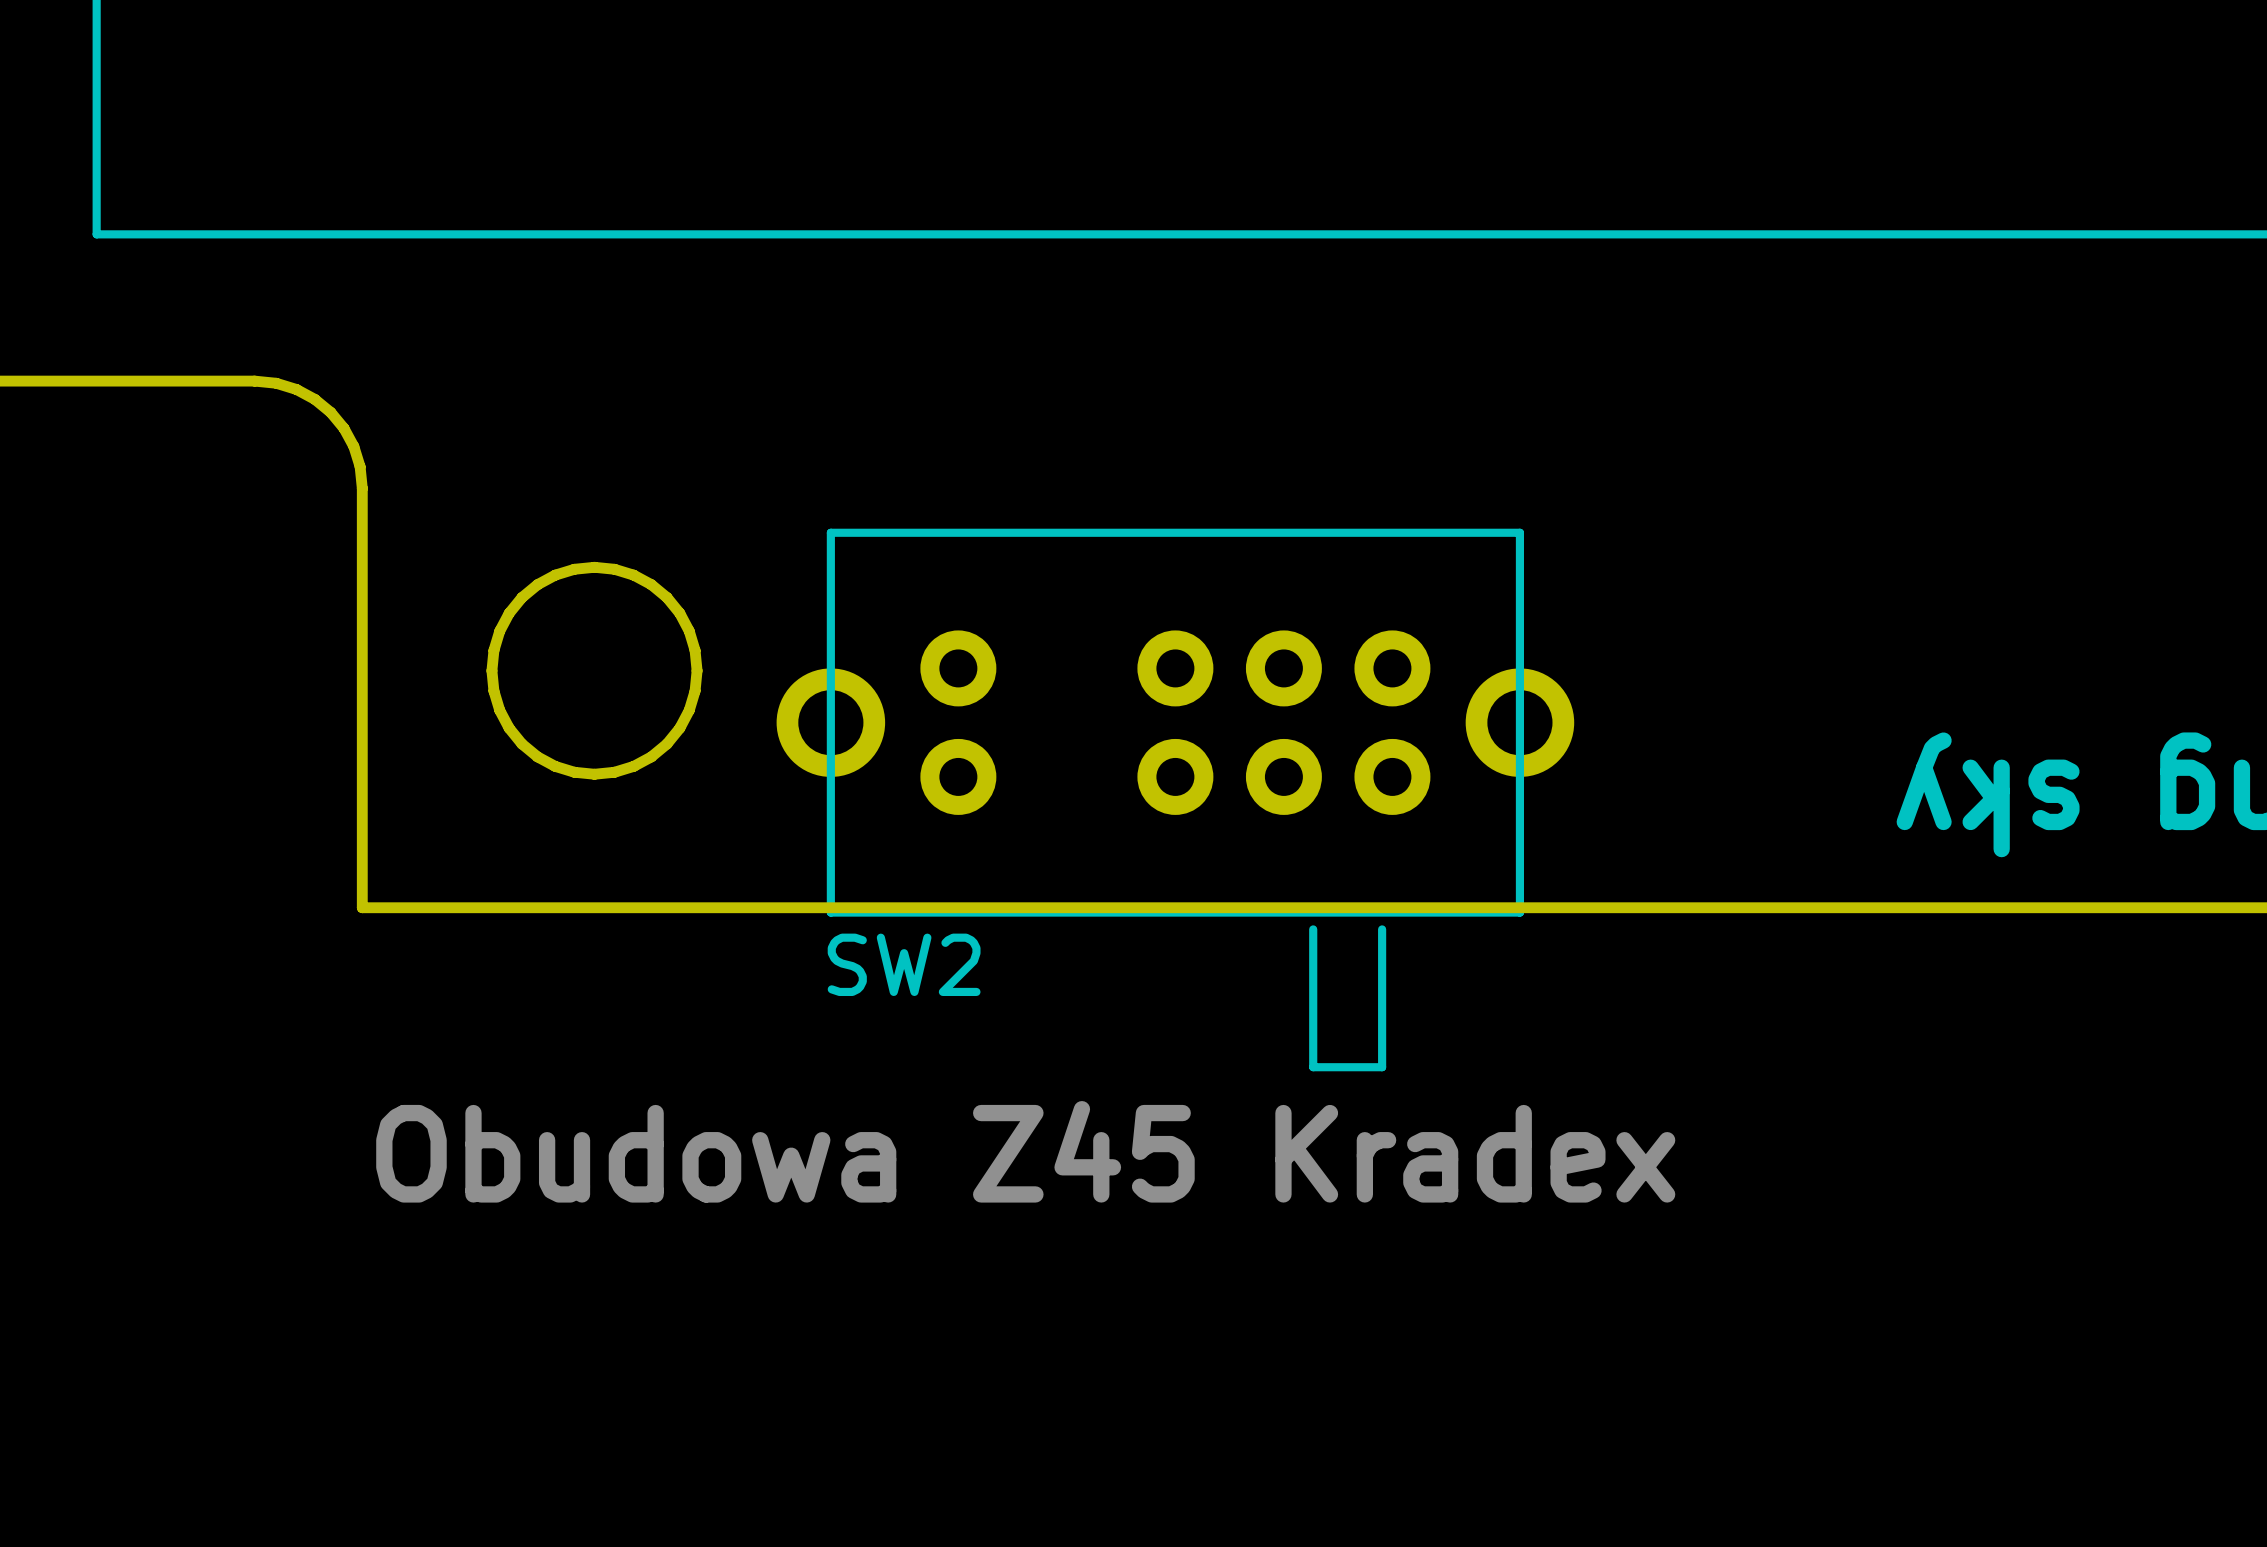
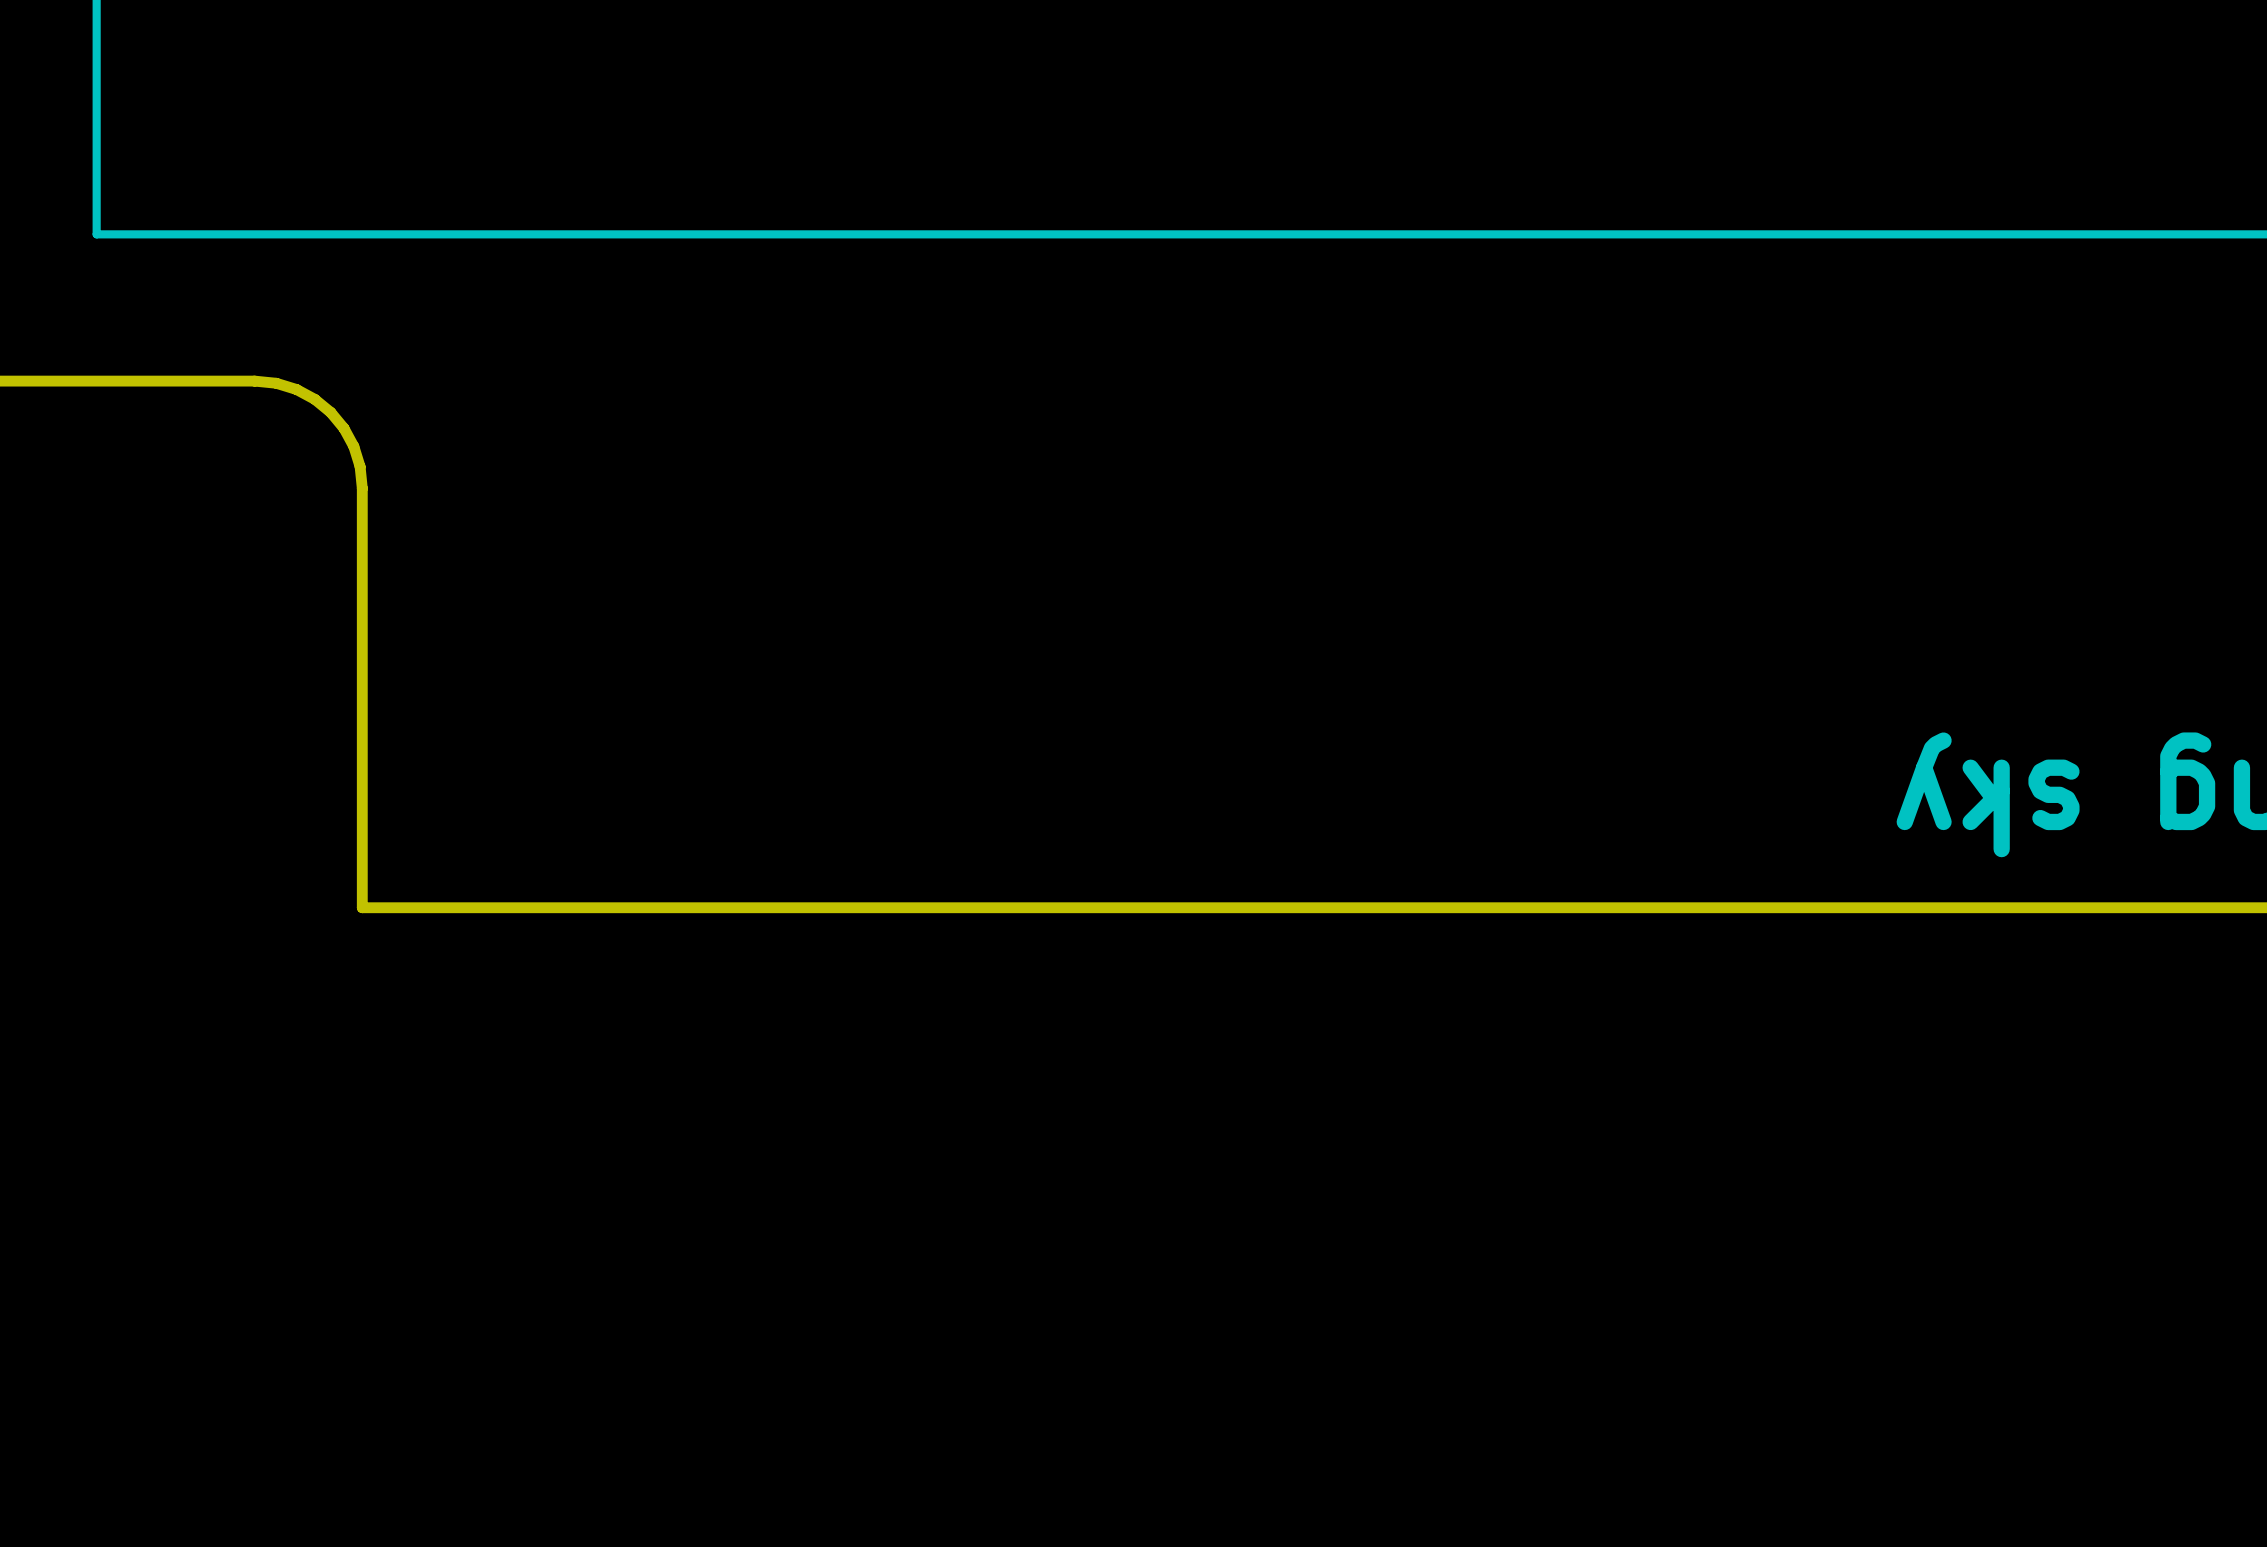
board edge: (594, 567) (614, 569) (633, 575) (651, 584) (667, 597) (679, 613) (689, 631) (695, 650) (697, 670) (695, 691) (689, 710) (679, 728) (667, 743) (651, 756) (633, 766) (614, 772) (594, 774) (574, 772) (555, 766) (537, 756) (521, 743) (509, 728) (499, 710) (493, 691) (491, 670) (493, 650) (499, 631) (509, 613) (521, 597) (537, 584) (555, 575) (574, 569) (594, 567) -> none
SW2: (1175, 799) -> none
text: Obudowa Z45 Kradex (1025, 1151) -> none

